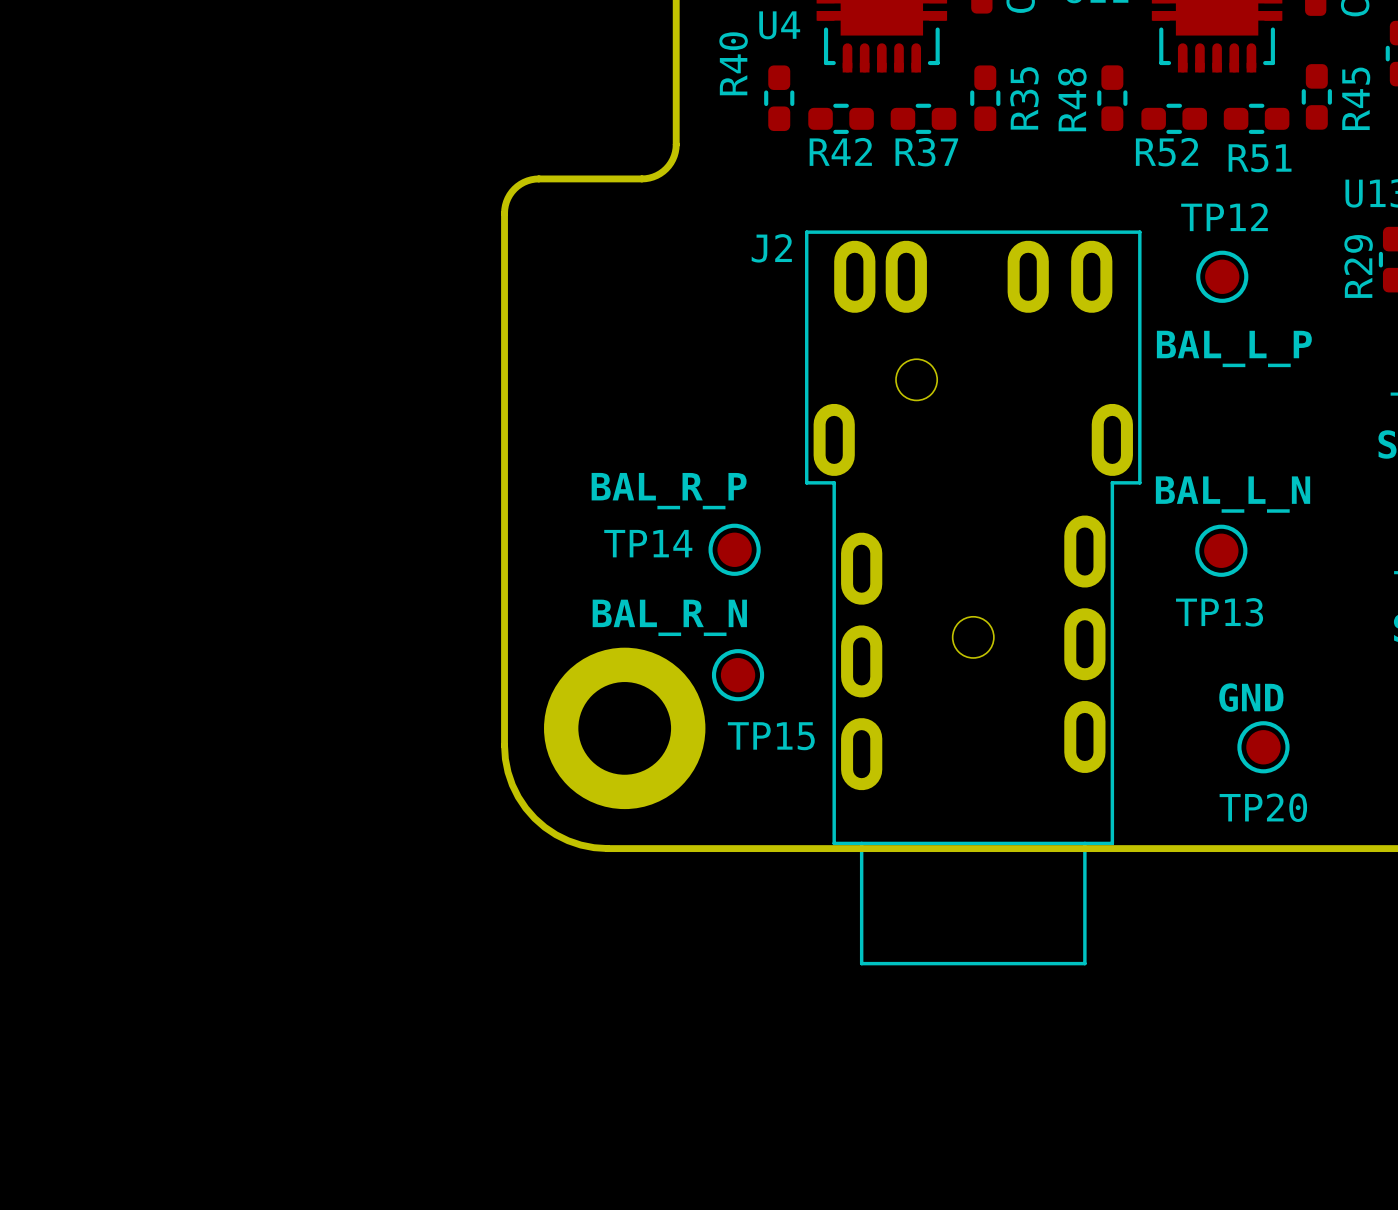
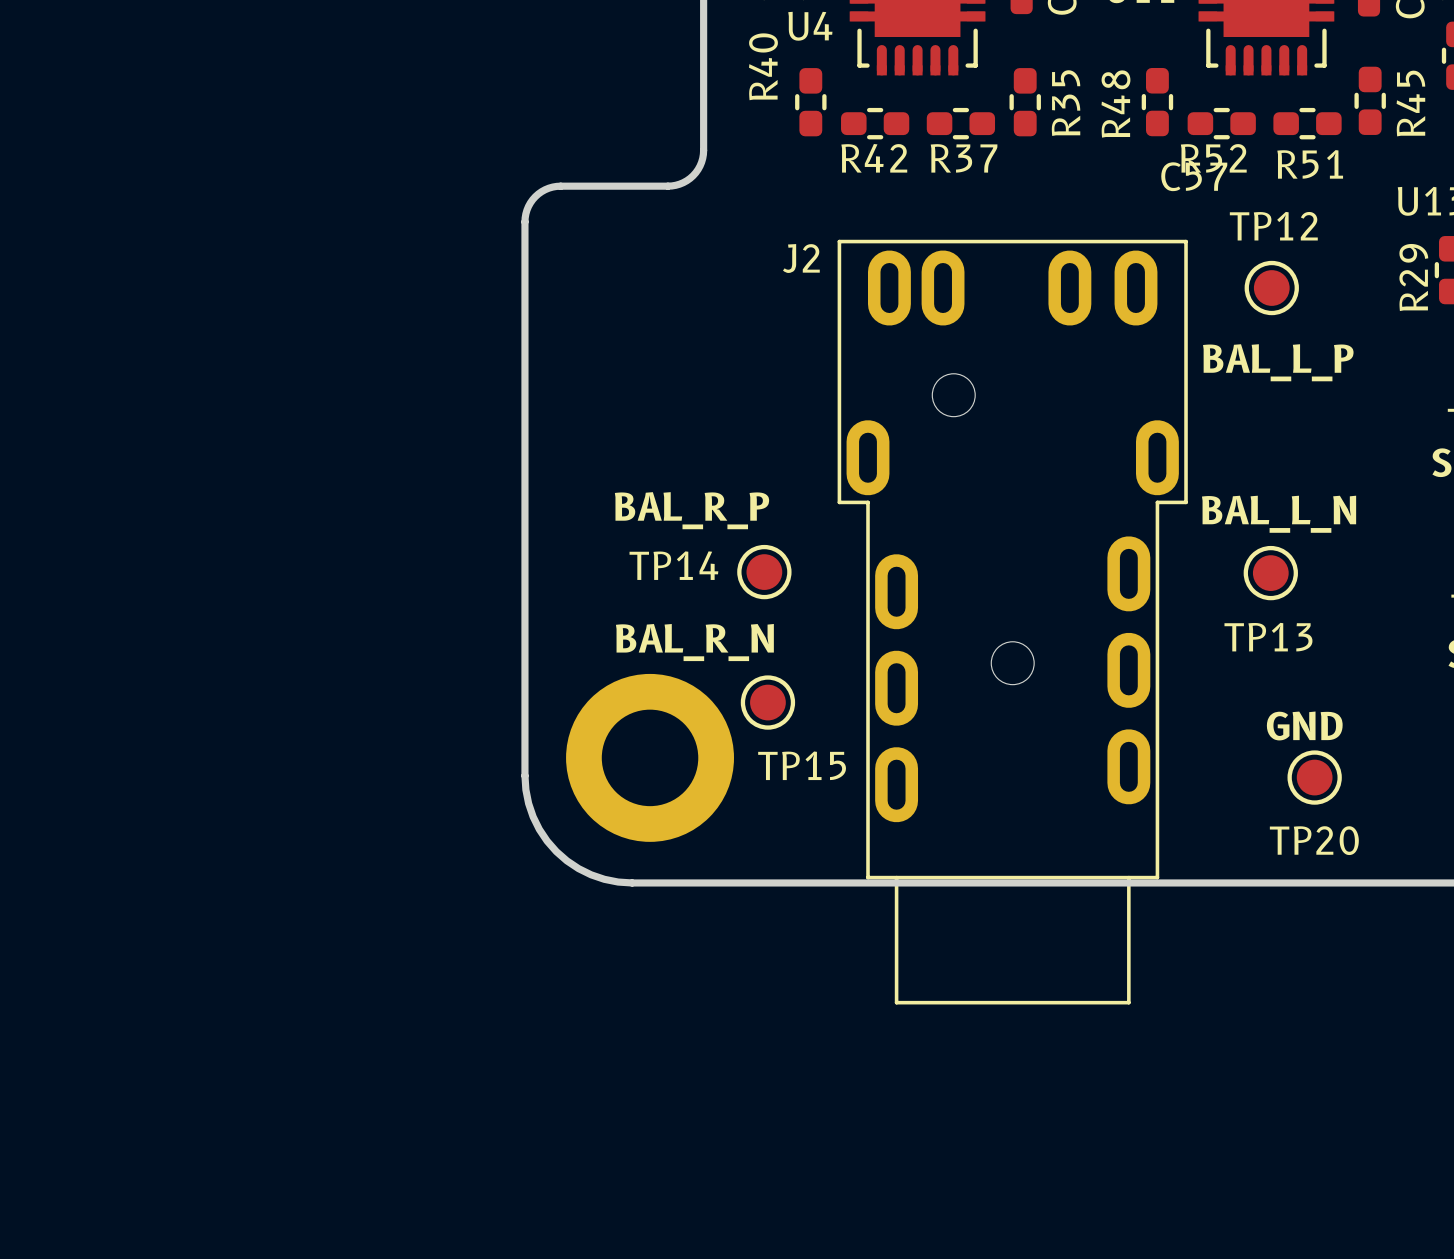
C57: none -> (1194, 176)

